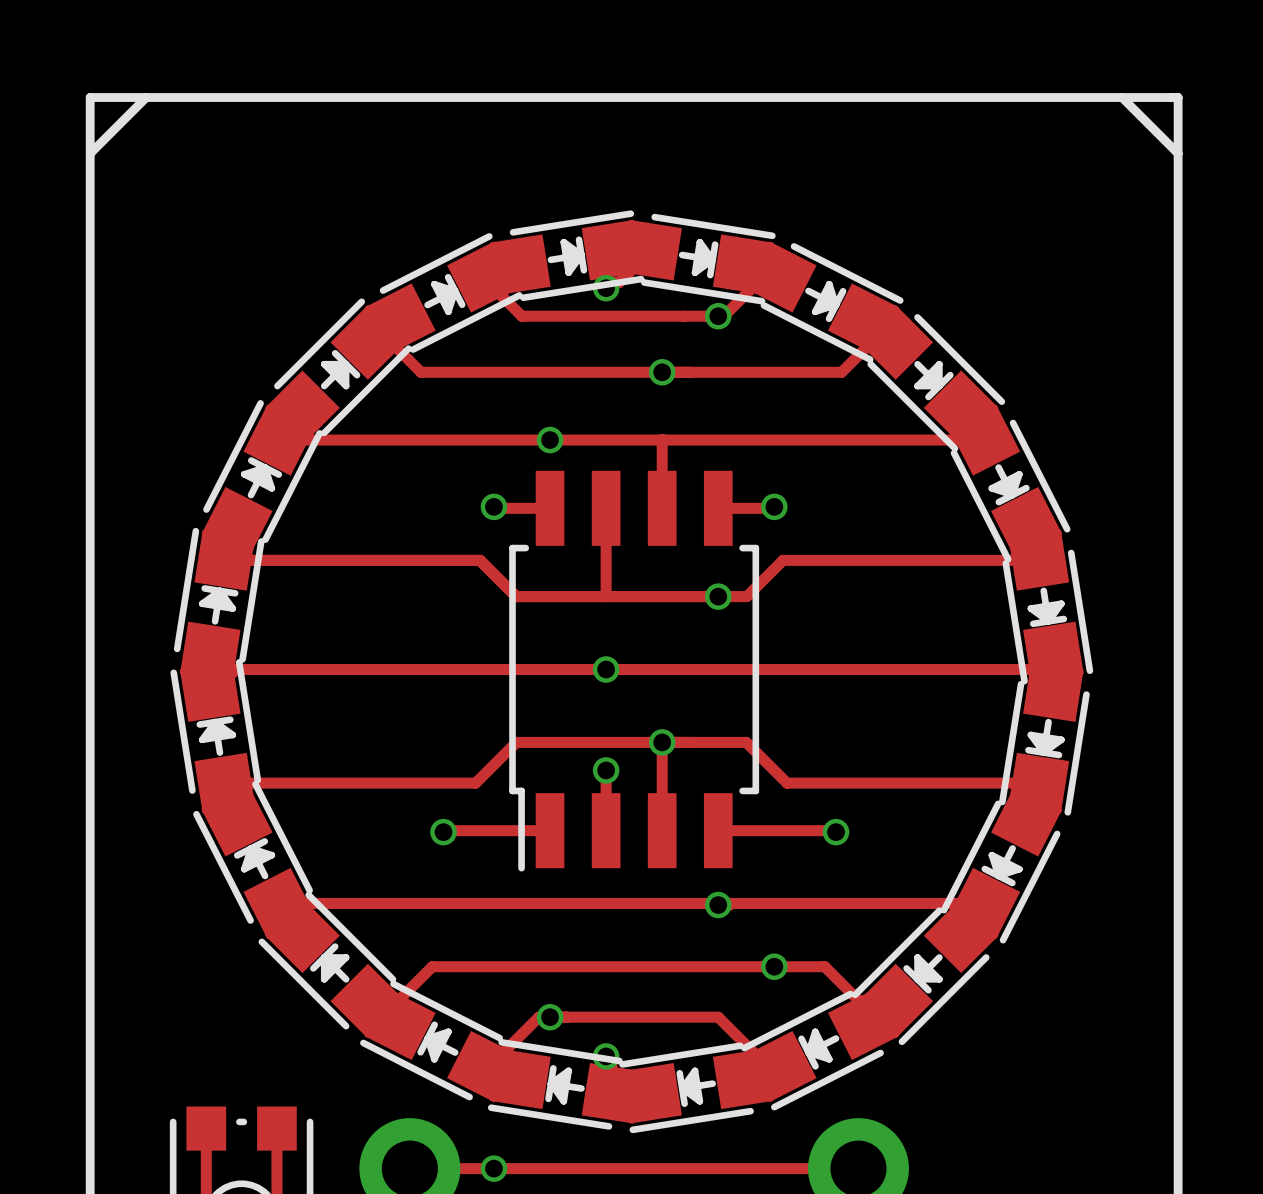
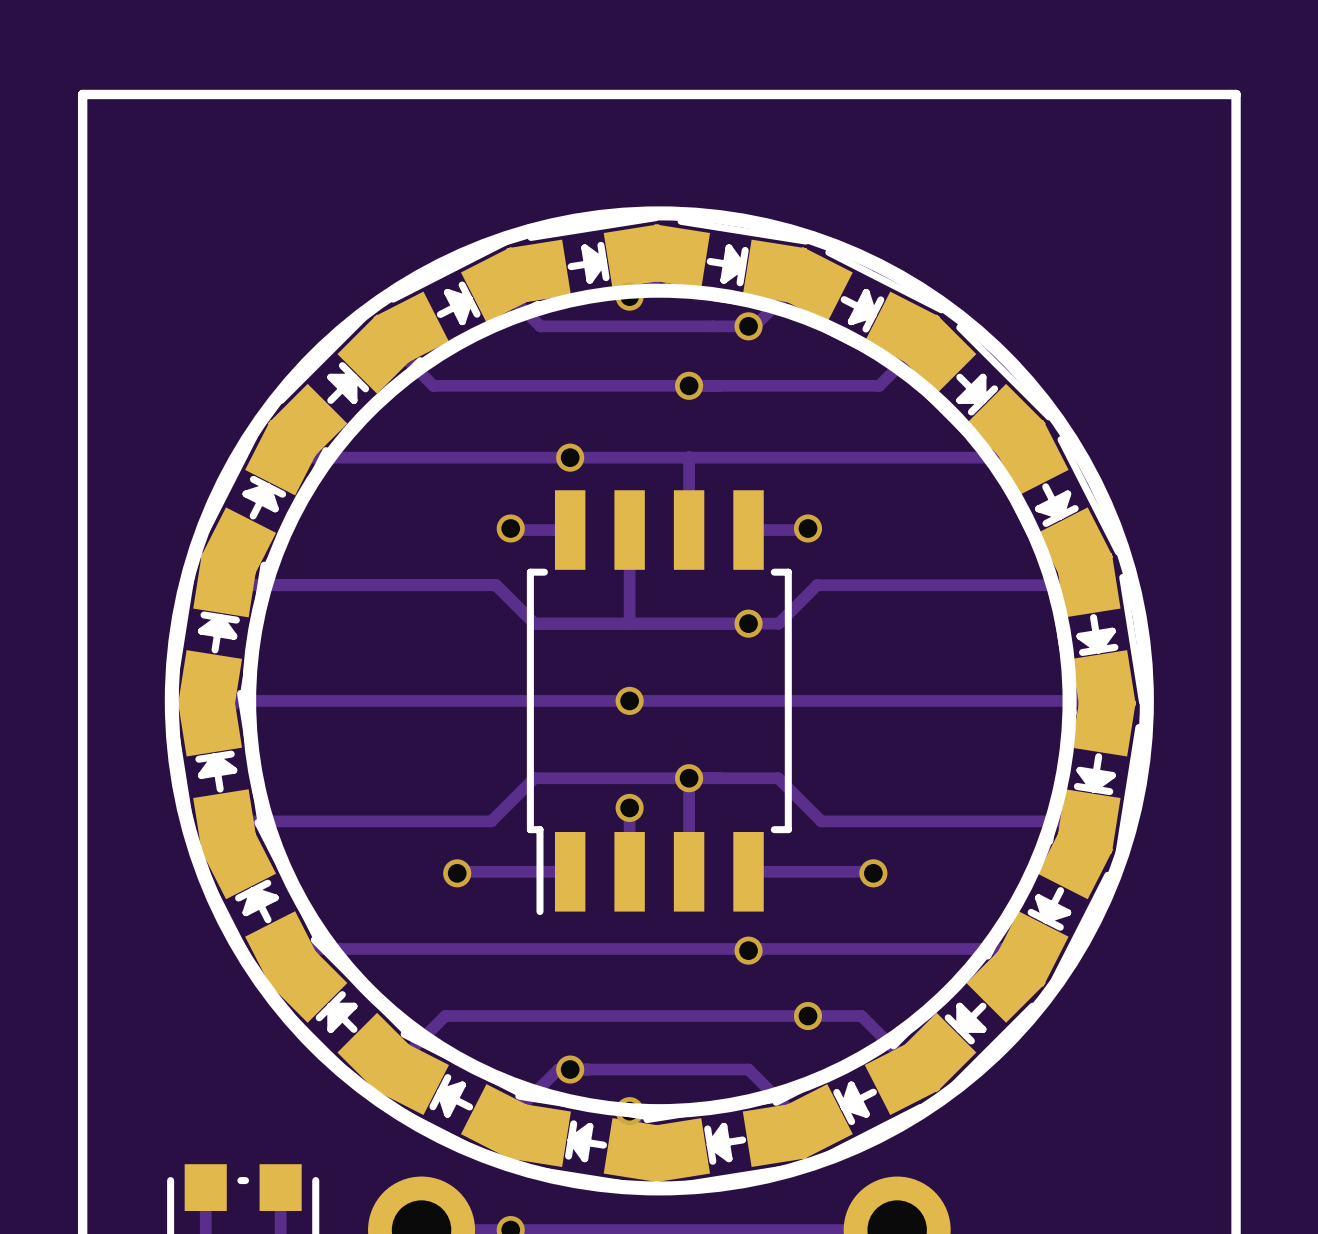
line: (146, 97) (90, 153) -> none
line: (1122, 97) (1178, 153) -> none
drawing: none -> [164, 206, 1154, 1196]

